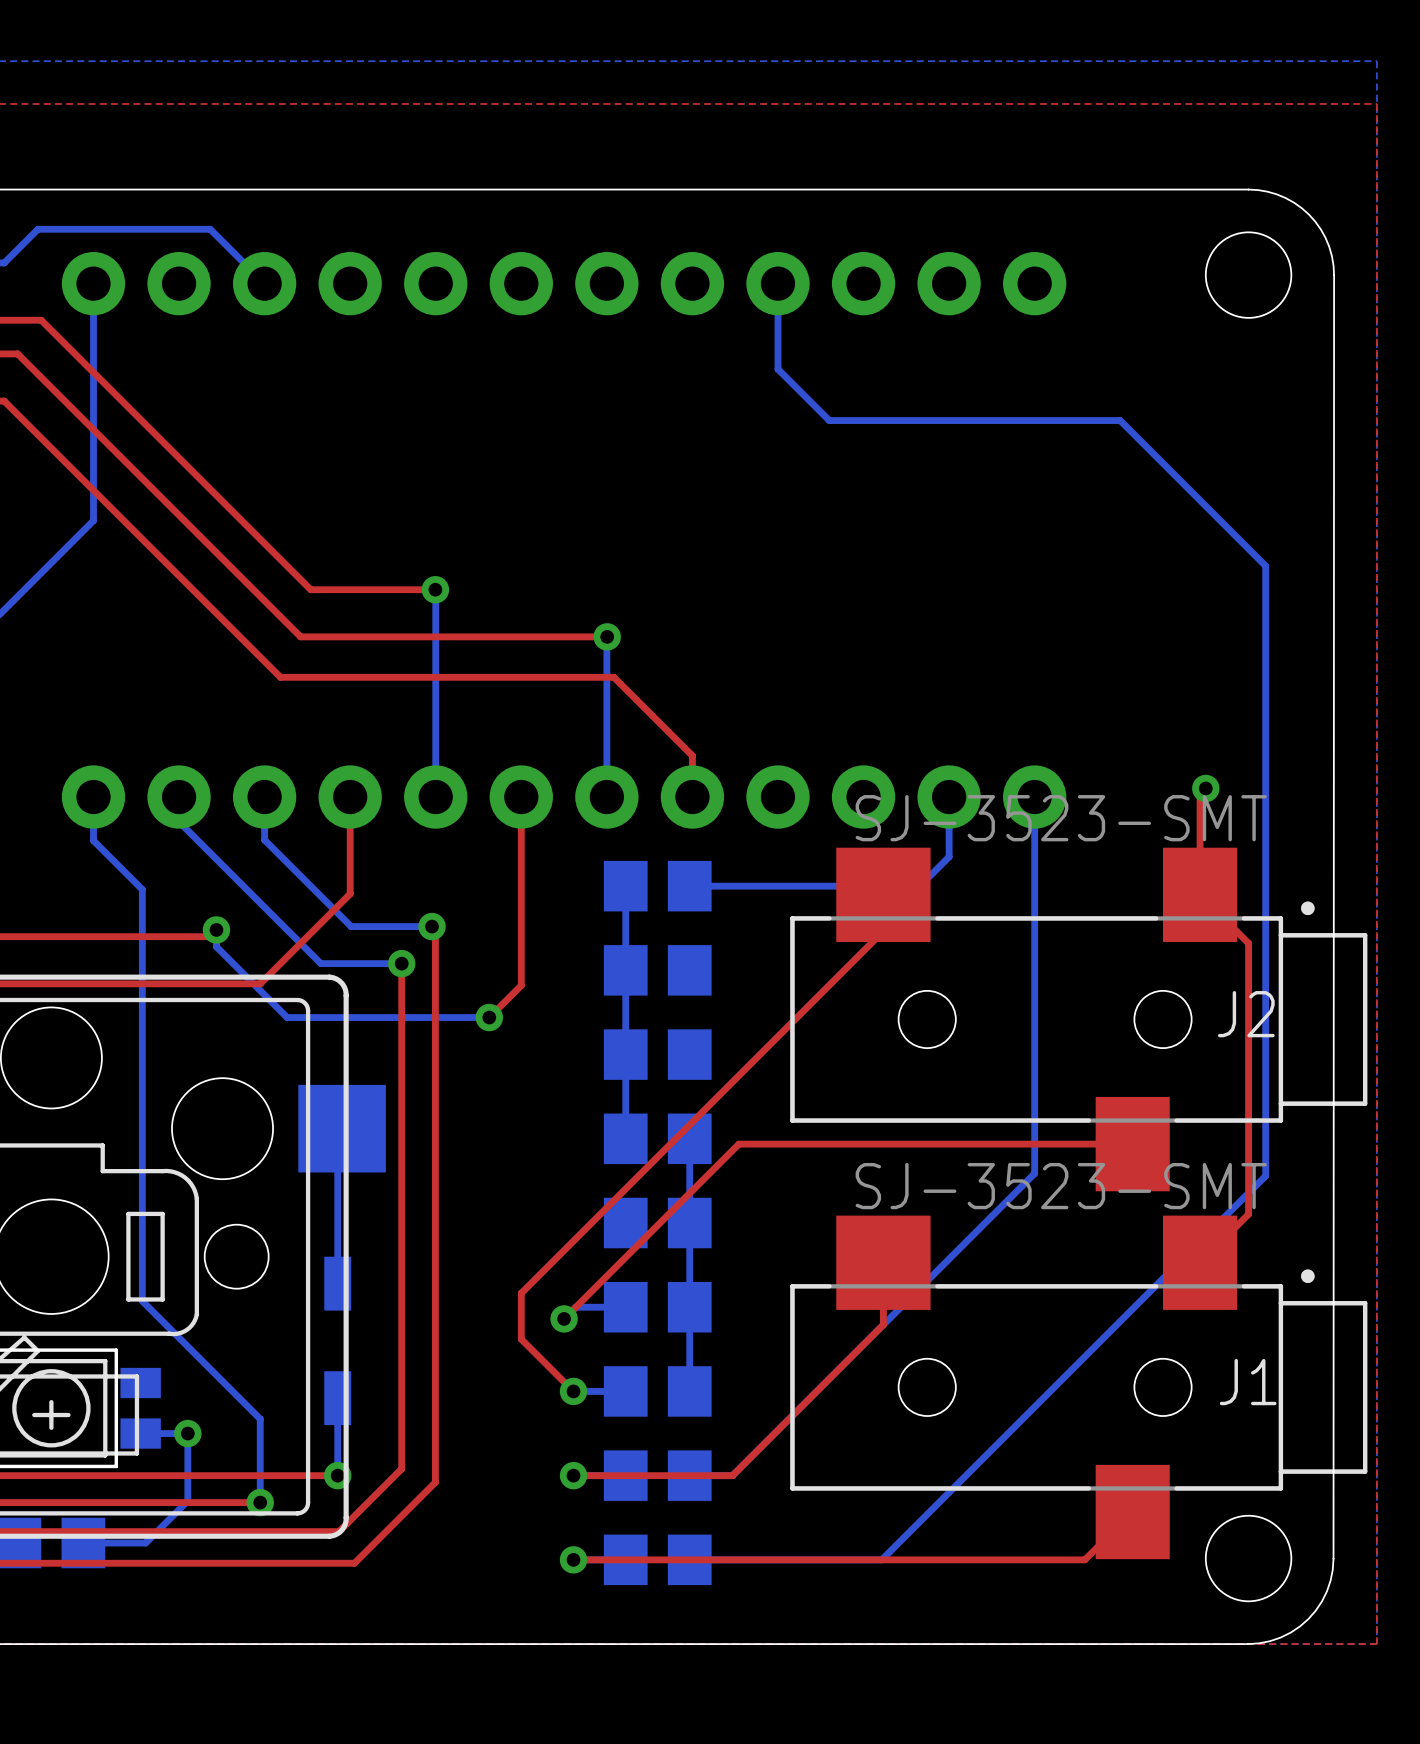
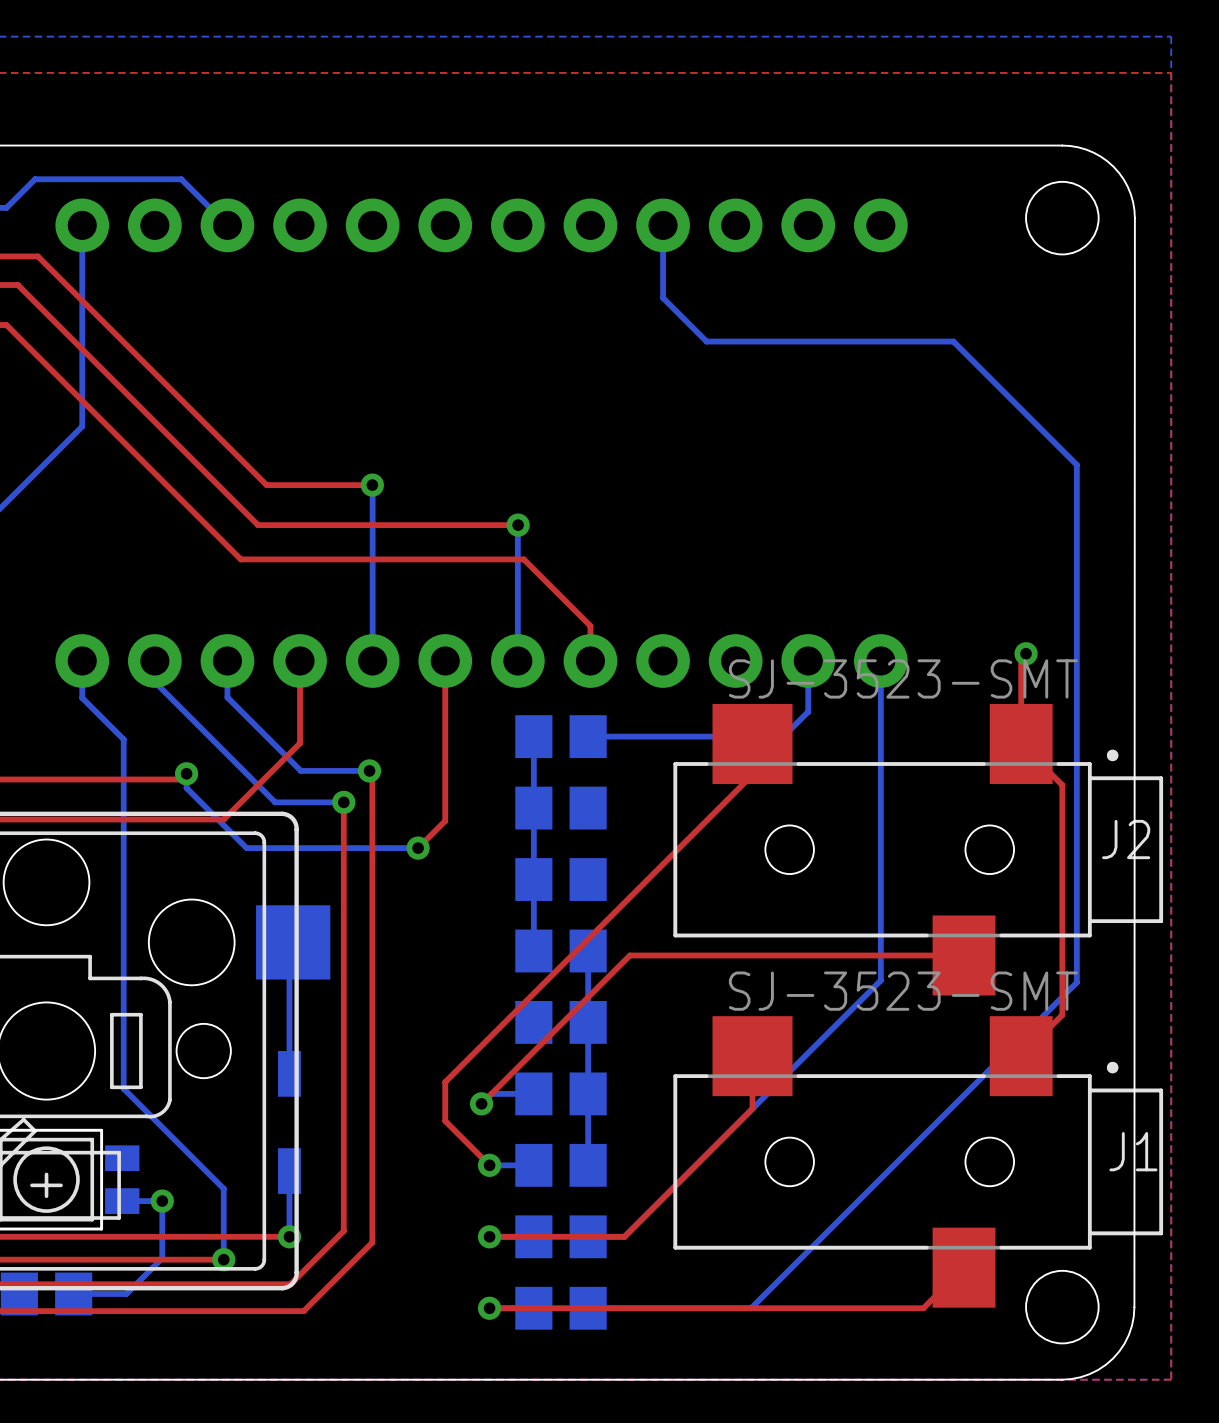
J2 name position: J2 (1246, 1014) -> J2 (1126, 839)
J1 name position: J1 (1248, 1382) -> J1 (1133, 1151)

